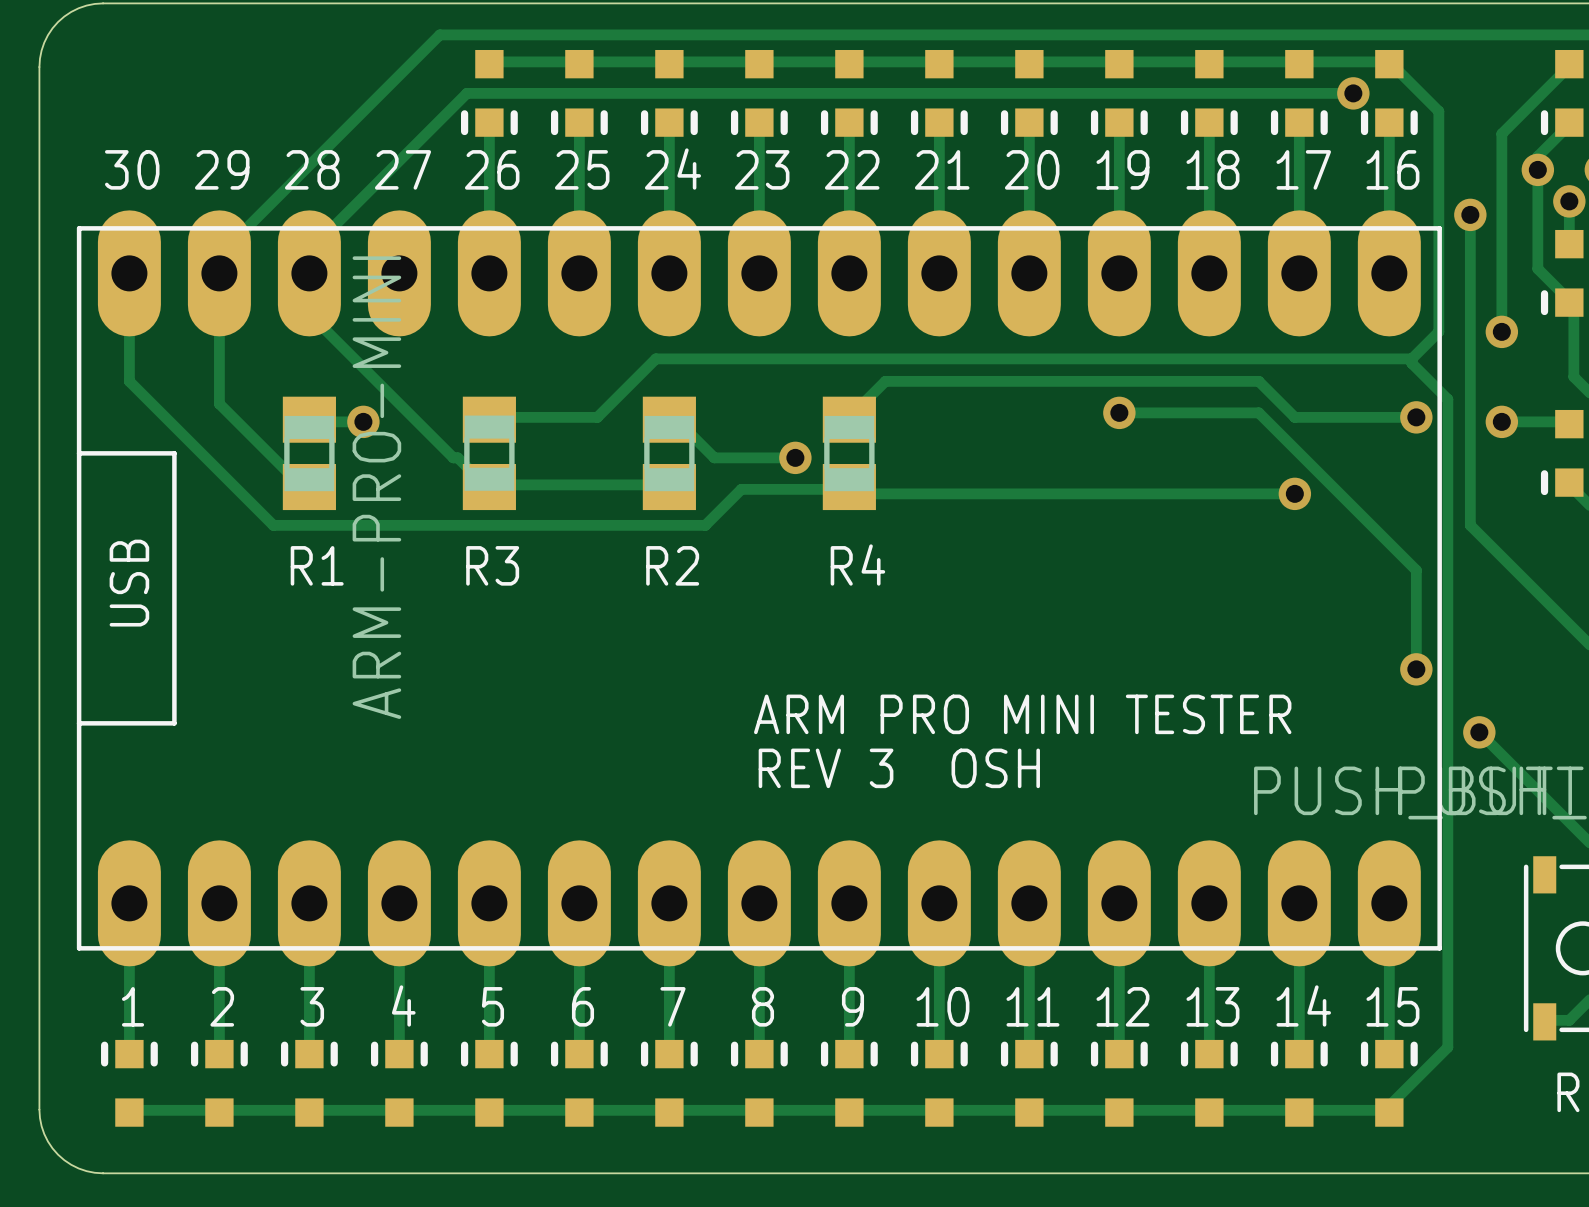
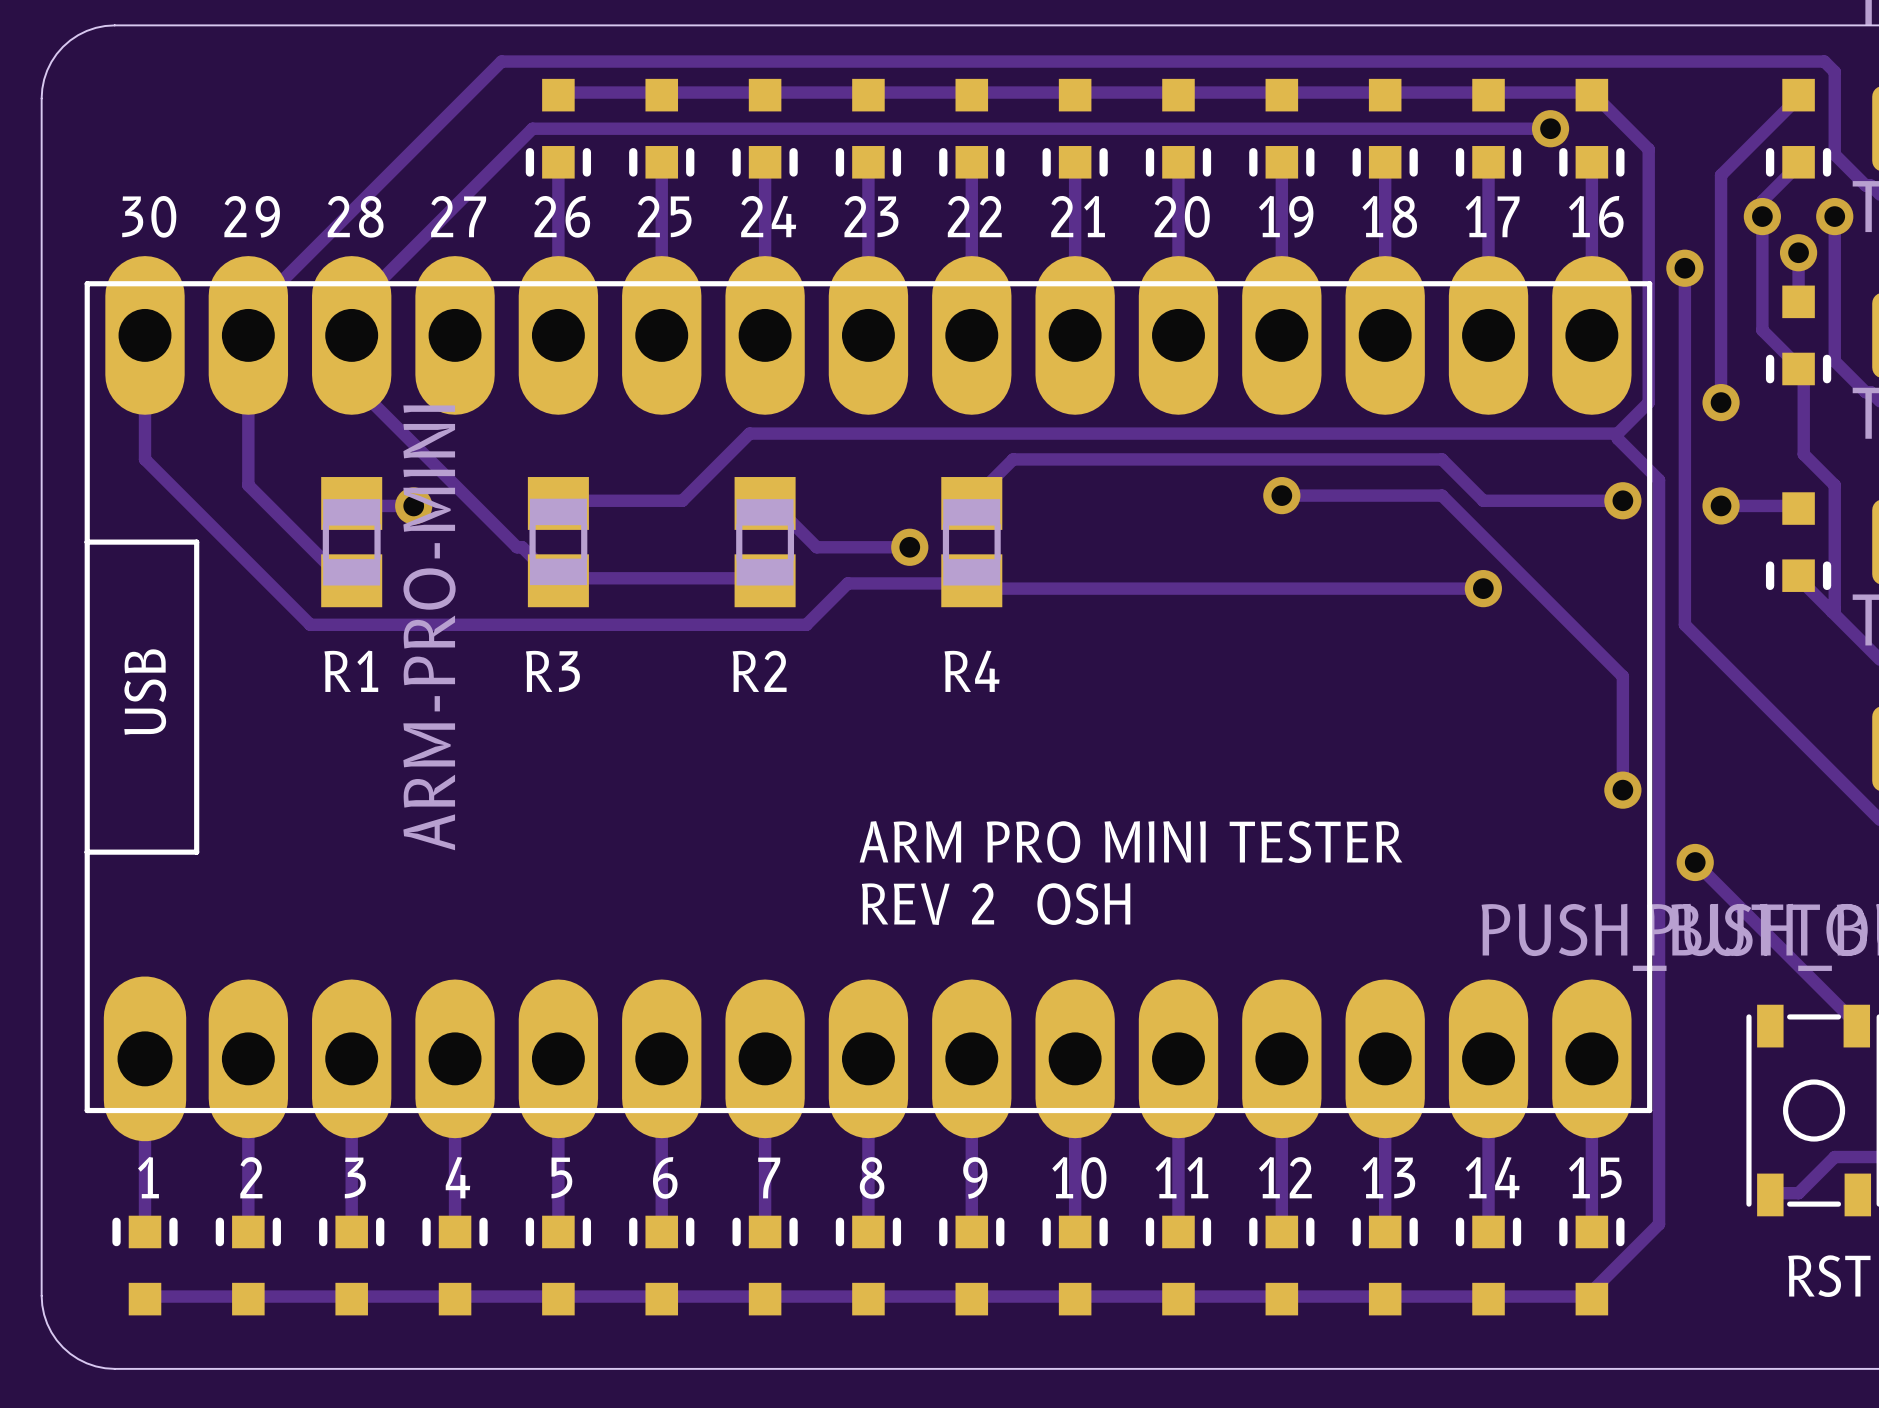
part footprint: [76, 210, 1442, 967] -> [84, 256, 1653, 1142]
text: REV 3 OSH (899, 768) -> REV 2 OSH (996, 904)

